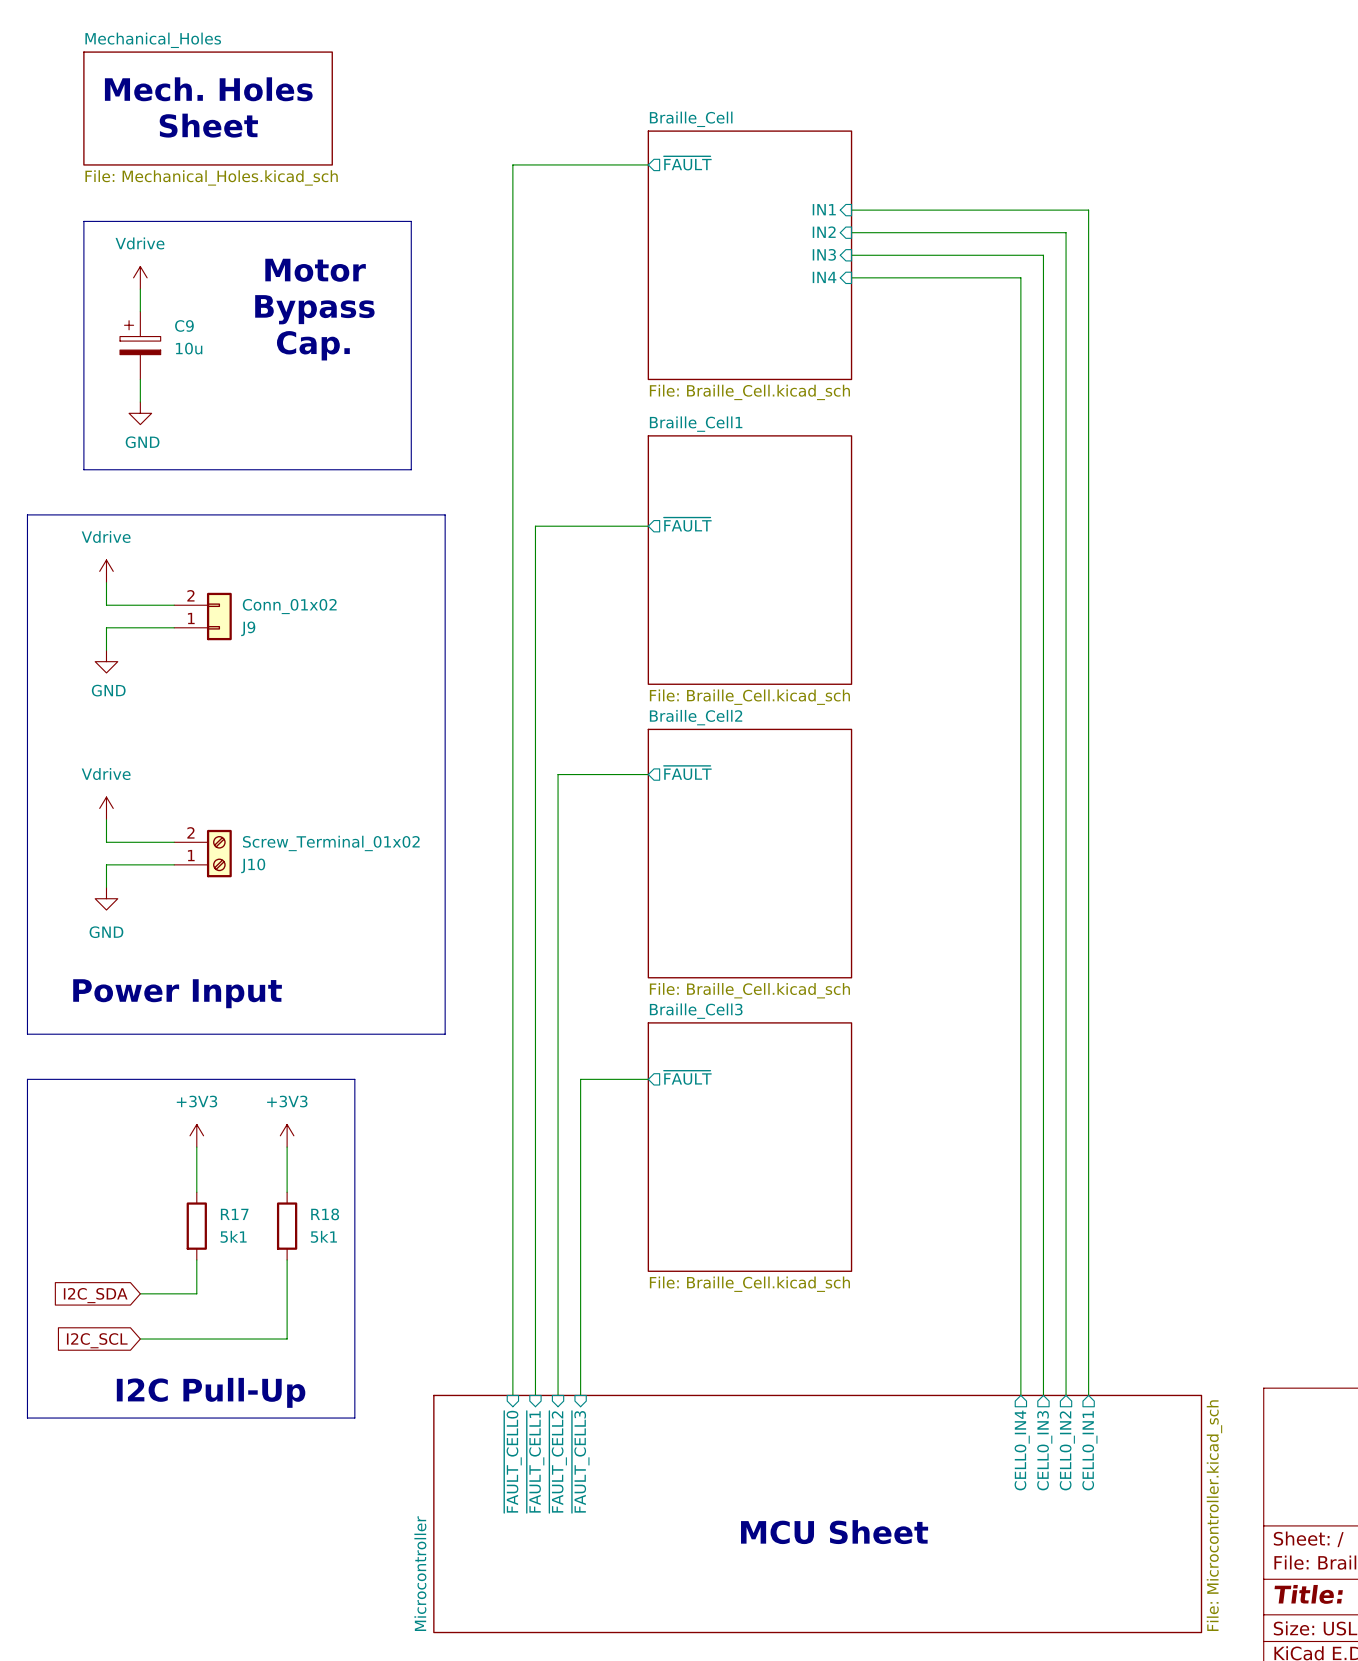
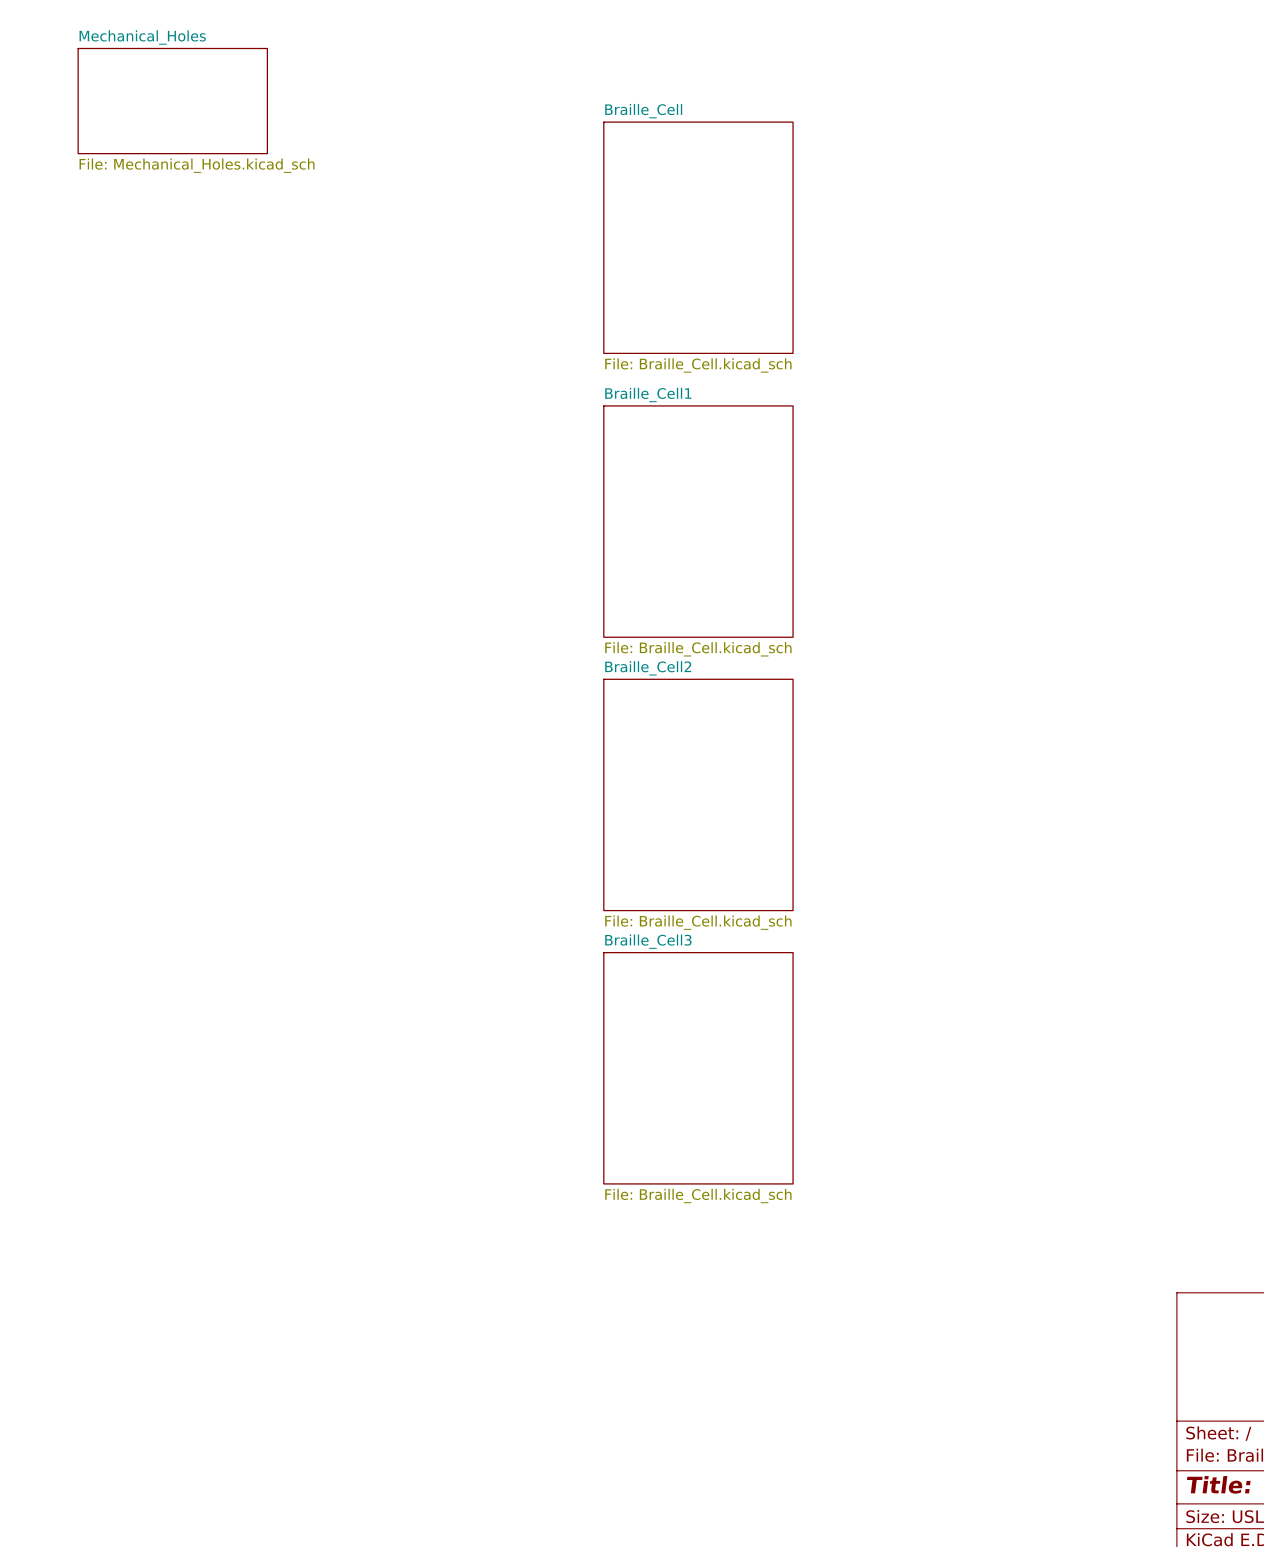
text: Mech. Holes (208, 89) -> none
sheet Mechanical_Holes: none -> File: Mechanical_Holes.kicad_sch (172, 101)
sheet Mechanical_Holes: File: Mechanical_Holes.kicad_sch (208, 108) -> none
text: Sheet (208, 125) -> none
sheet pin: ~{FAULT} (687, 163) -> none
wire: (648, 164) (512, 164) (512, 1395) -> none
sheet pin: IN1 (824, 209) -> none
wire: (851, 210) (1088, 210) (1088, 1395) -> none
line: (83, 221) (411, 221) (411, 469) (83, 469) (83, 221) -> none
sheet pin: IN2 (824, 232) -> none
wire: (851, 232) (1066, 232) (1066, 1395) -> none
sheet pin: IN3 (824, 254) -> none
wire: (851, 255) (1043, 255) (1043, 1395) -> none
text: Motor (315, 270) -> none
power symbol: Vdrive (140, 277) -> none
sheet pin: IN4 (824, 277) -> none
wire: (851, 277) (1020, 277) (1020, 1395) -> none
wire: (140, 289) (140, 311) -> none
text: Bypass (314, 309) -> none
C9: 10u (140, 345) -> none
text: Cap. (313, 345) -> none
wire: (140, 379) (140, 402) -> none
power symbol: GND (140, 413) -> none
line: (27, 514) (27, 1034) (445, 1034) (445, 514) (27, 514) -> none
sheet pin: ~{FAULT} (687, 524) -> none
wire: (648, 526) (535, 526) (535, 1395) -> none
power symbol: Vdrive (106, 571) -> none
wire: (106, 582) (106, 605) (174, 605) -> none
J9: Conn_01x02 (203, 616) -> none
wire: (174, 627) (106, 627) (106, 650) -> none
power symbol: GND (106, 661) -> none
sheet pin: ~{FAULT} (687, 772) -> none
wire: (648, 774) (558, 774) (558, 1395) -> none
power symbol: Vdrive (106, 808) -> none
wire: (106, 819) (106, 842) (174, 842) -> none
J10: Screw_Terminal_01x02 (203, 853) -> none
wire: (174, 864) (106, 864) (106, 887) -> none
power symbol: GND (106, 898) -> none
text: Power Input (177, 993) -> none
sheet pin: ~{FAULT} (687, 1077) -> none
line: (27, 1079) (354, 1079) (354, 1418) (27, 1418) (27, 1079) -> none
wire: (648, 1079) (580, 1079) (580, 1395) -> none
power symbol: +3V3 (196, 1135) -> none
power symbol: +3V3 (287, 1135) -> none
wire: (196, 1147) (196, 1192) -> none
wire: (287, 1147) (287, 1192) -> none
R17: 5k1 (196, 1226) -> none
R18: 5k1 (287, 1226) -> none
wire: (196, 1259) (196, 1293) (140, 1293) -> none
wire: (287, 1259) (287, 1339) (140, 1339) -> none
global label: I2C_SDA (95, 1295) -> none
global label: I2C_SCL (97, 1340) -> none
text: I2C Pull-Up (211, 1392) -> none
sheet pin: CELL0_IN4 (1022, 1450) -> none
sheet pin: CELL0_IN3 (1044, 1450) -> none
sheet pin: CELL0_IN2 (1067, 1450) -> none
sheet pin: CELL0_IN1 (1089, 1450) -> none
sheet pin: ~{FAULT_CELL0} (512, 1461) -> none
sheet pin: ~{FAULT_CELL1} (535, 1461) -> none
sheet pin: ~{FAULT_CELL2} (558, 1461) -> none
sheet pin: ~{FAULT_CELL3} (580, 1461) -> none
sheet Microcontroller: File: Microcontroller.kicad_sch (817, 1513) -> none
text: MCU Sheet (834, 1532) -> none

